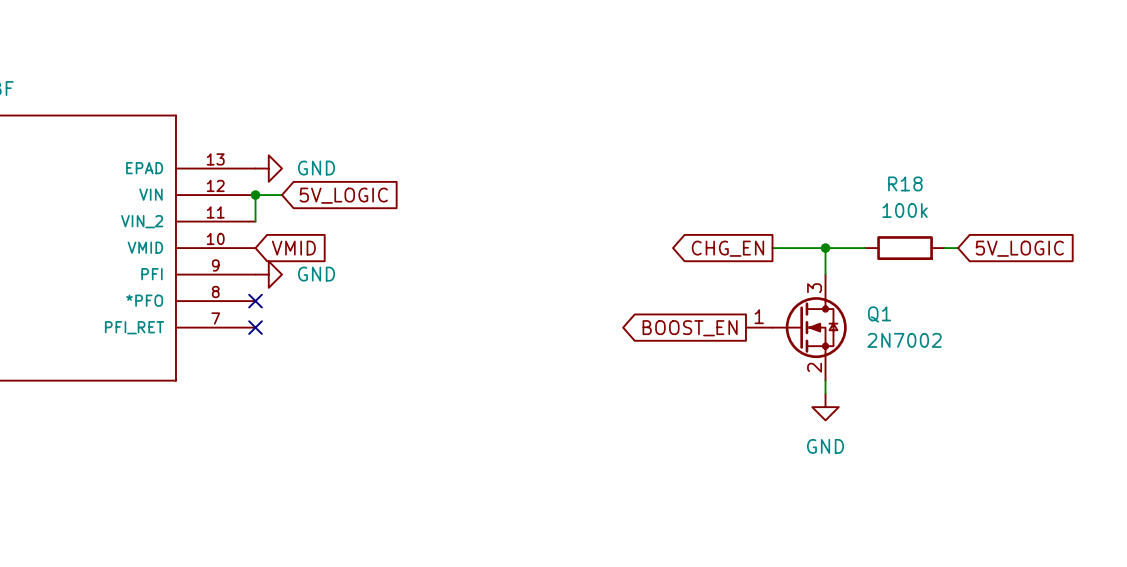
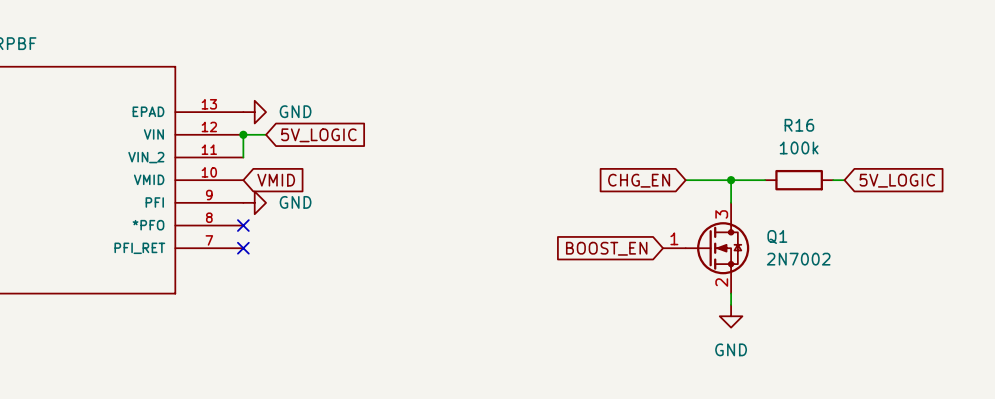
R18 name: R18 (905, 183) -> R16 (799, 125)
global label shape: output (727, 248) -> input (639, 180)
global label shape: output (690, 328) -> input (606, 248)

